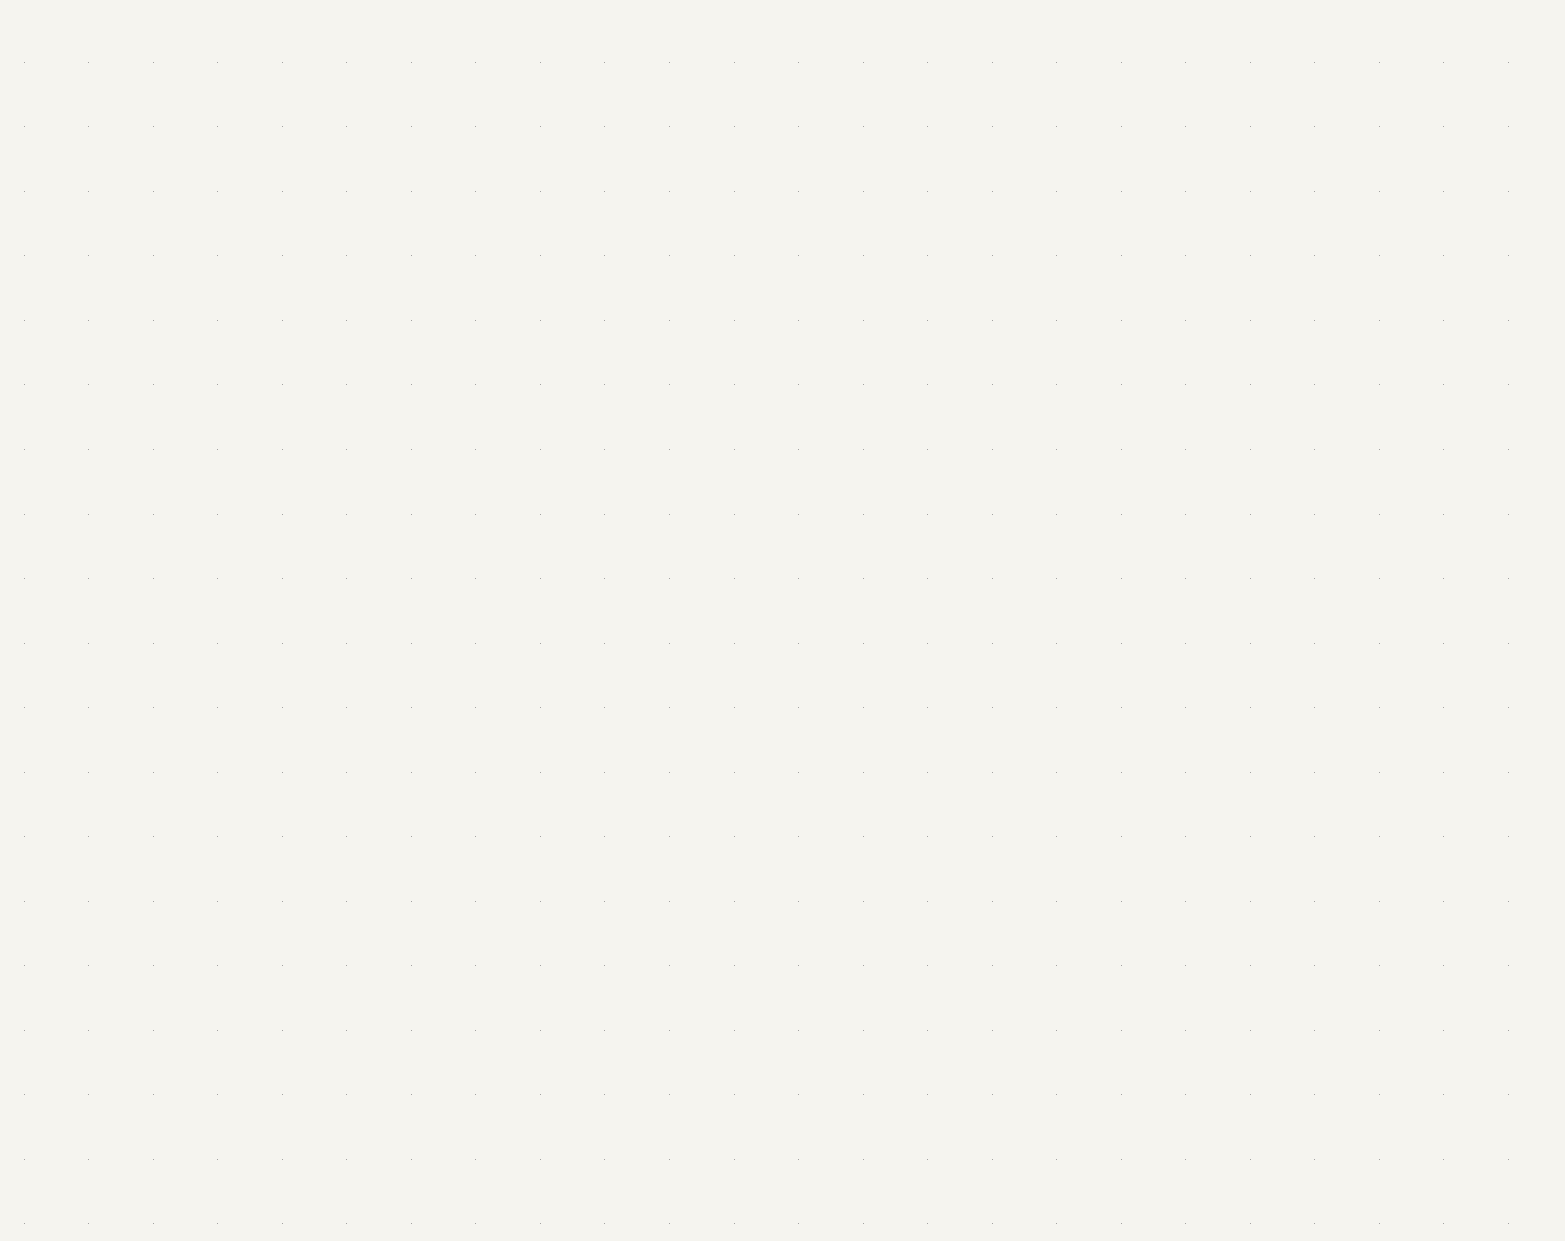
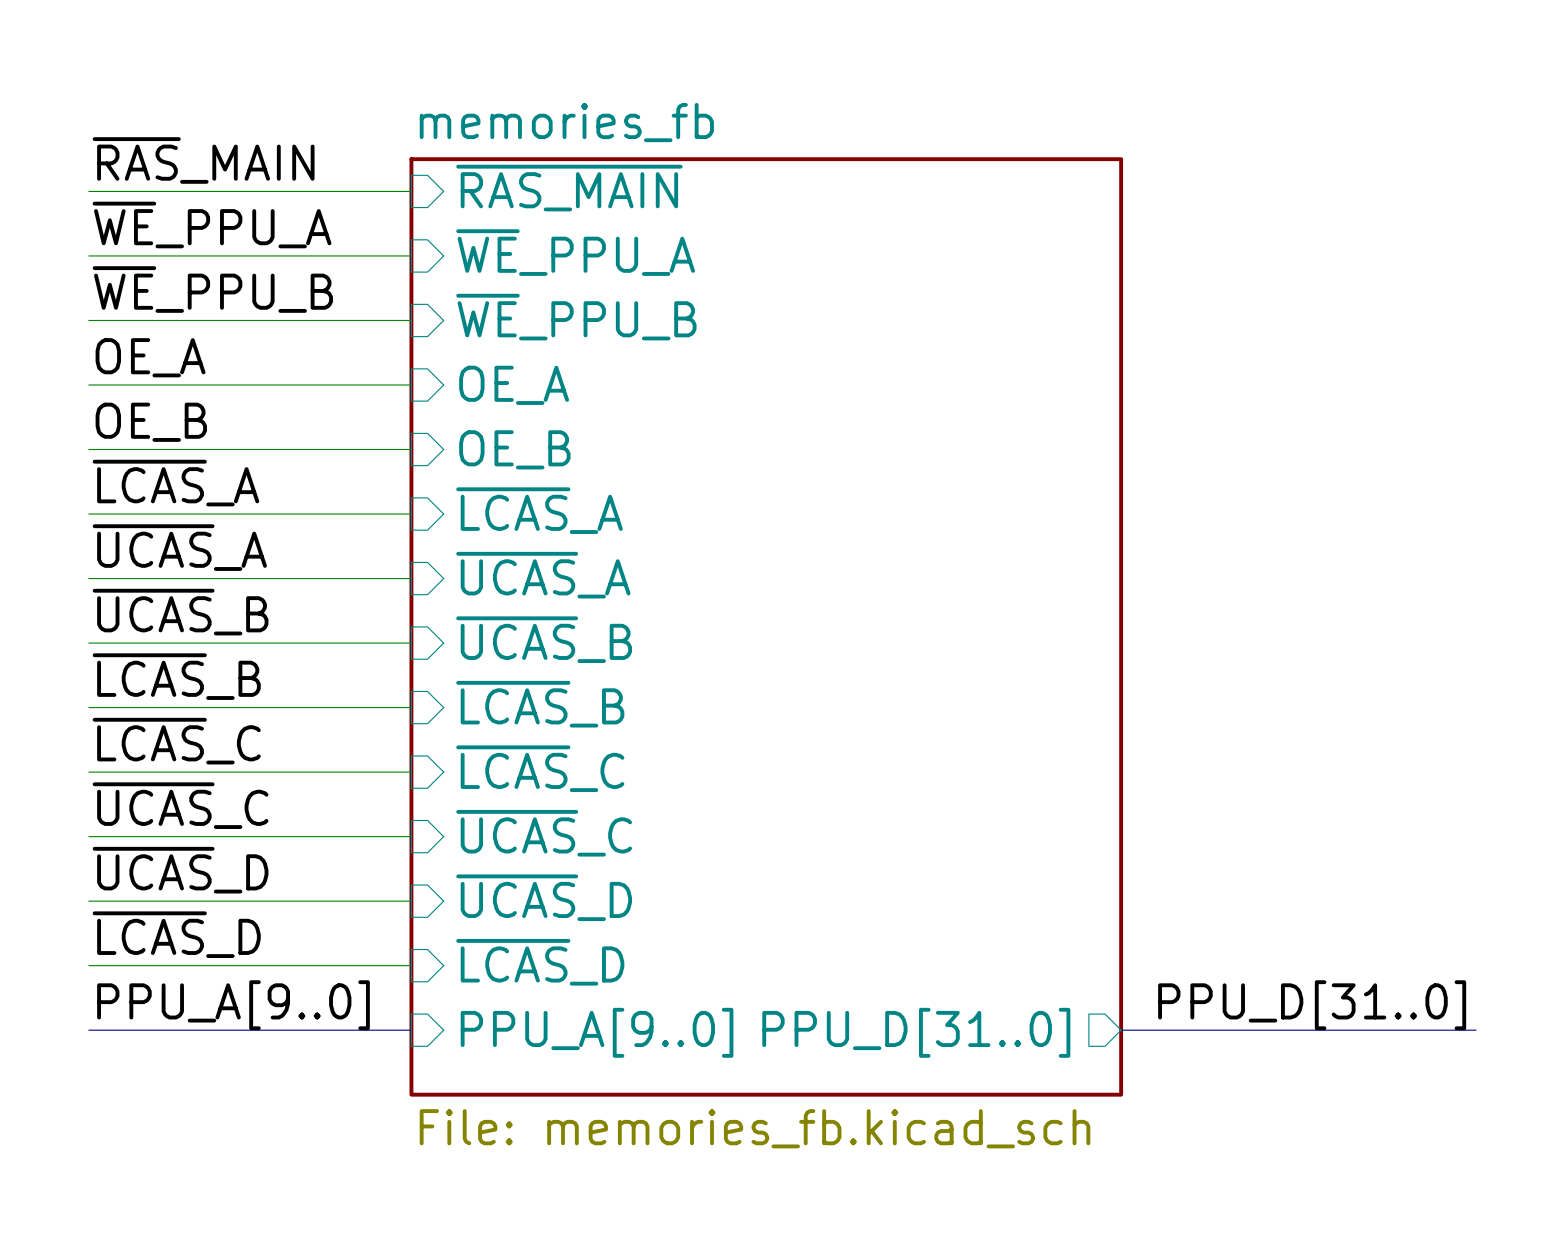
label: none -> ~{RAS}_MAIN (203, 160)
wire: none -> (88, 191) (411, 191)
sheet pin: none -> ~{RAS_MAIN} (569, 188)
label: none -> ~{WE}_PPU_A (212, 225)
wire: none -> (88, 255) (411, 255)
sheet pin: none -> ~{WE}_PPU_A (575, 252)
label: none -> ~{WE}_PPU_B (212, 289)
wire: none -> (88, 320) (411, 320)
sheet pin: none -> ~{WE}_PPU_B (576, 317)
label: none -> OE_A (150, 357)
wire: none -> (88, 384) (411, 384)
sheet pin: none -> OE_A (514, 385)
label: none -> OE_B (151, 422)
wire: none -> (88, 449) (411, 449)
sheet pin: none -> OE_B (514, 449)
label: none -> ~{LCAS}_A (175, 483)
wire: none -> (88, 514) (411, 514)
sheet pin: none -> ~{LCAS}_A (539, 510)
label: none -> ~{UCAS}_A (179, 547)
wire: none -> (88, 578) (411, 578)
sheet pin: none -> ~{UCAS}_A (543, 575)
label: none -> ~{UCAS}_B (180, 612)
sheet memories_fb: none -> File: memories_fb.kicad_sch (766, 626)
wire: none -> (88, 643) (411, 643)
sheet pin: none -> ~{UCAS}_B (544, 639)
label: none -> ~{LCAS}_B (176, 676)
wire: none -> (88, 707) (411, 707)
sheet pin: none -> ~{LCAS}_B (540, 704)
label: none -> ~{LCAS}_C (176, 741)
wire: none -> (88, 772) (411, 772)
sheet pin: none -> ~{LCAS}_C (540, 768)
label: none -> ~{UCAS}_C (180, 805)
wire: none -> (88, 836) (411, 836)
sheet pin: none -> ~{UCAS}_C (544, 833)
label: none -> ~{UCAS}_D (180, 870)
wire: none -> (88, 901) (411, 901)
sheet pin: none -> ~{UCAS}_D (544, 897)
label: none -> ~{LCAS}_D (176, 934)
wire: none -> (88, 965) (411, 965)
sheet pin: none -> ~{LCAS}_D (540, 962)
label: none -> PPU_A[9..0] (233, 1005)
label: none -> PPU_D[31..0] (1312, 1005)
bus: none -> (88, 1030) (411, 1030)
bus: none -> (1121, 1030) (1475, 1030)
sheet pin: none -> PPU_A[9..0] (597, 1032)
sheet pin: none -> PPU_D[31..0] (916, 1032)

